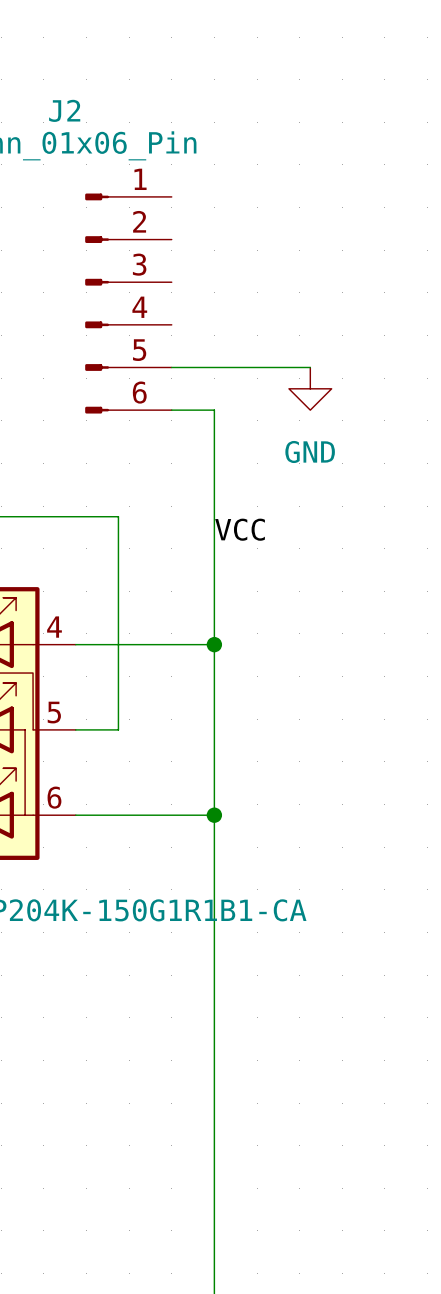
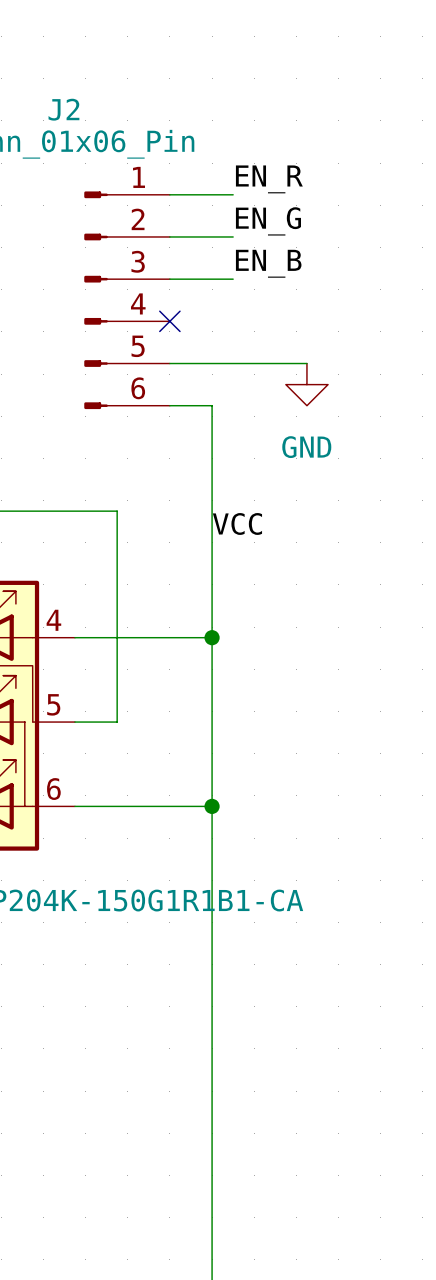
label: none -> EN_R (269, 179)
wire: none -> (169, 194) (233, 194)
label: none -> EN_G (268, 221)
wire: none -> (169, 236) (233, 236)
label: none -> EN_B (268, 263)
wire: none -> (169, 279) (233, 279)
no-connect mark: none -> (169, 321)

